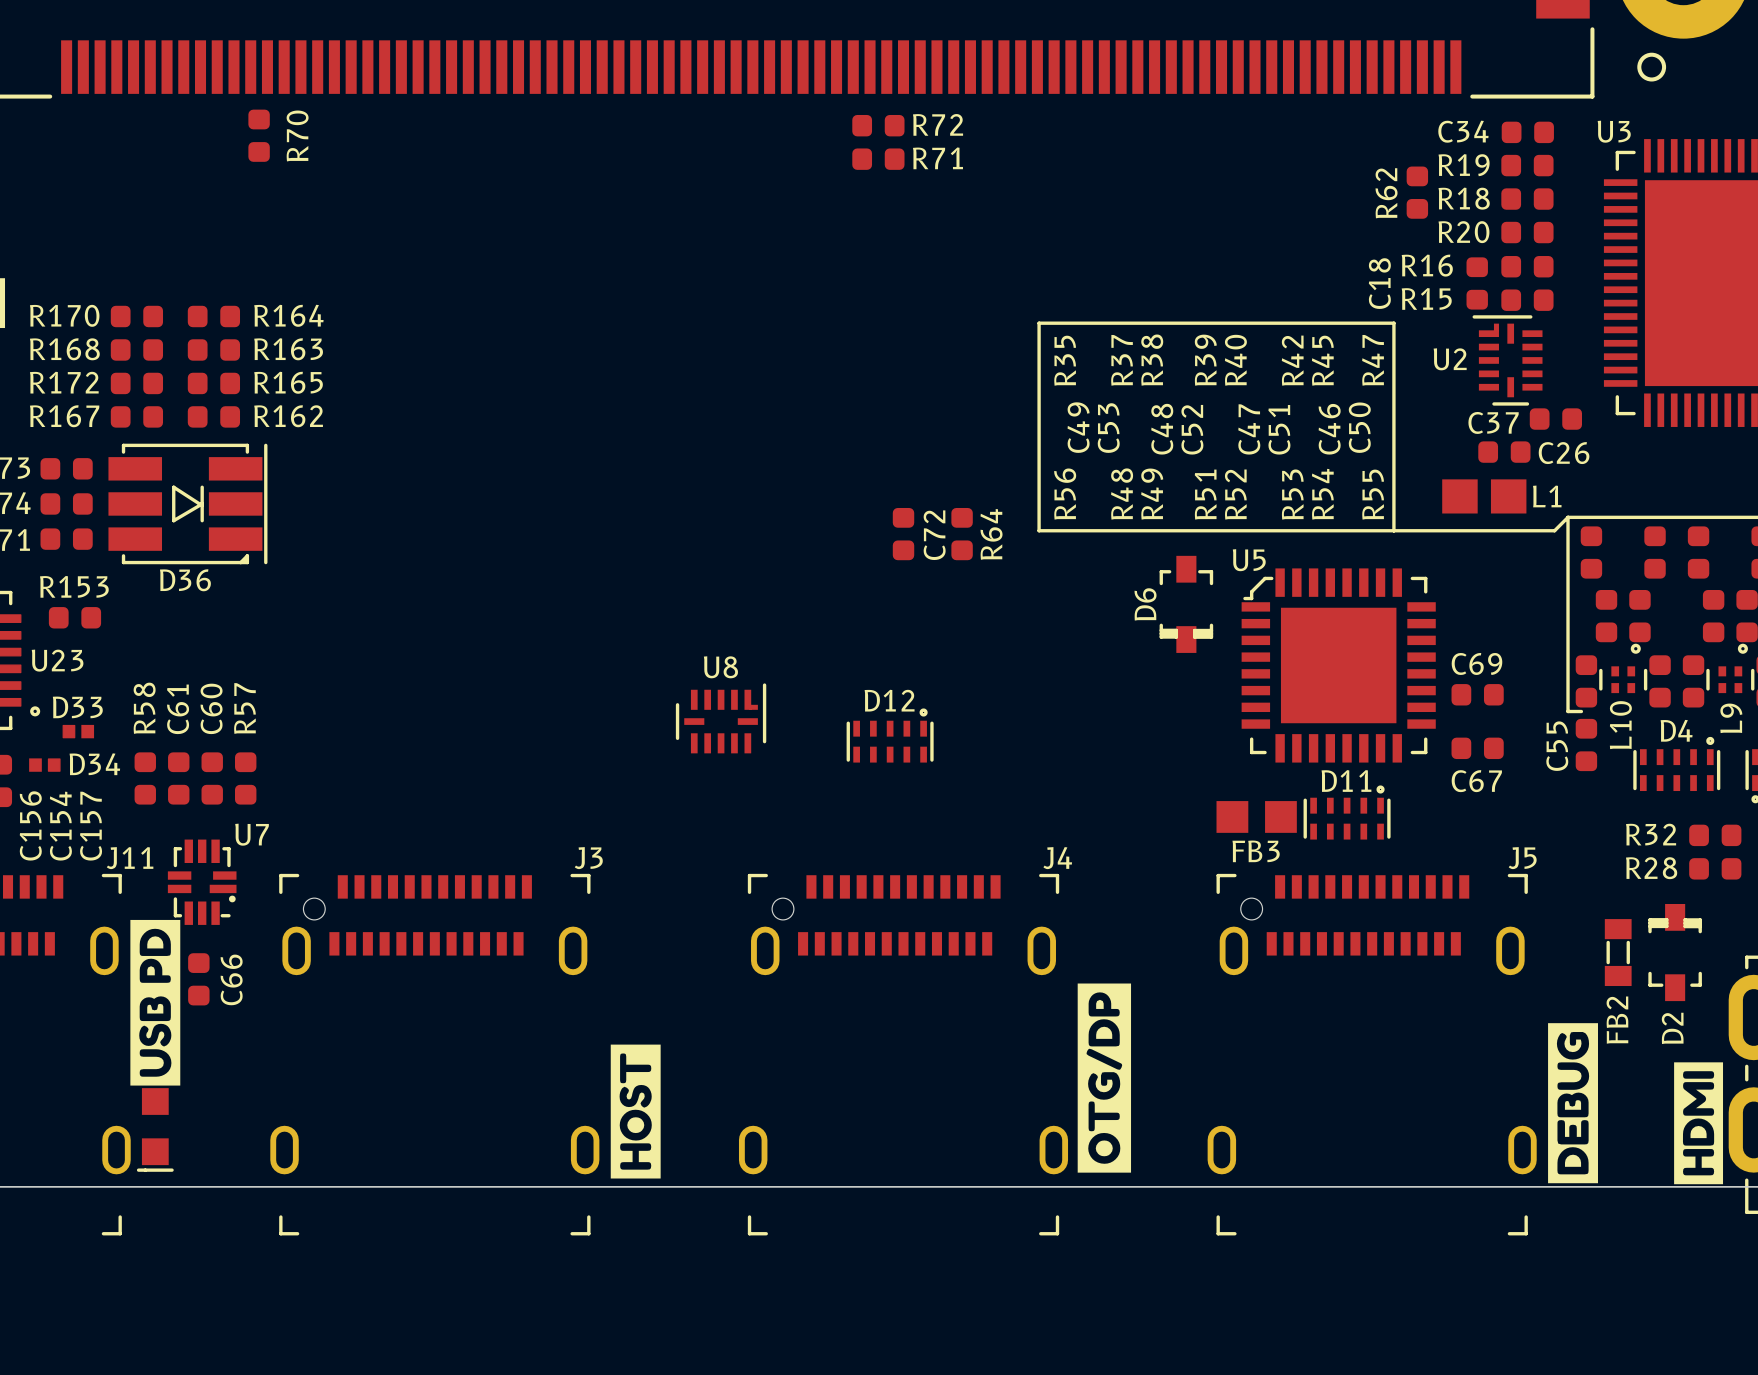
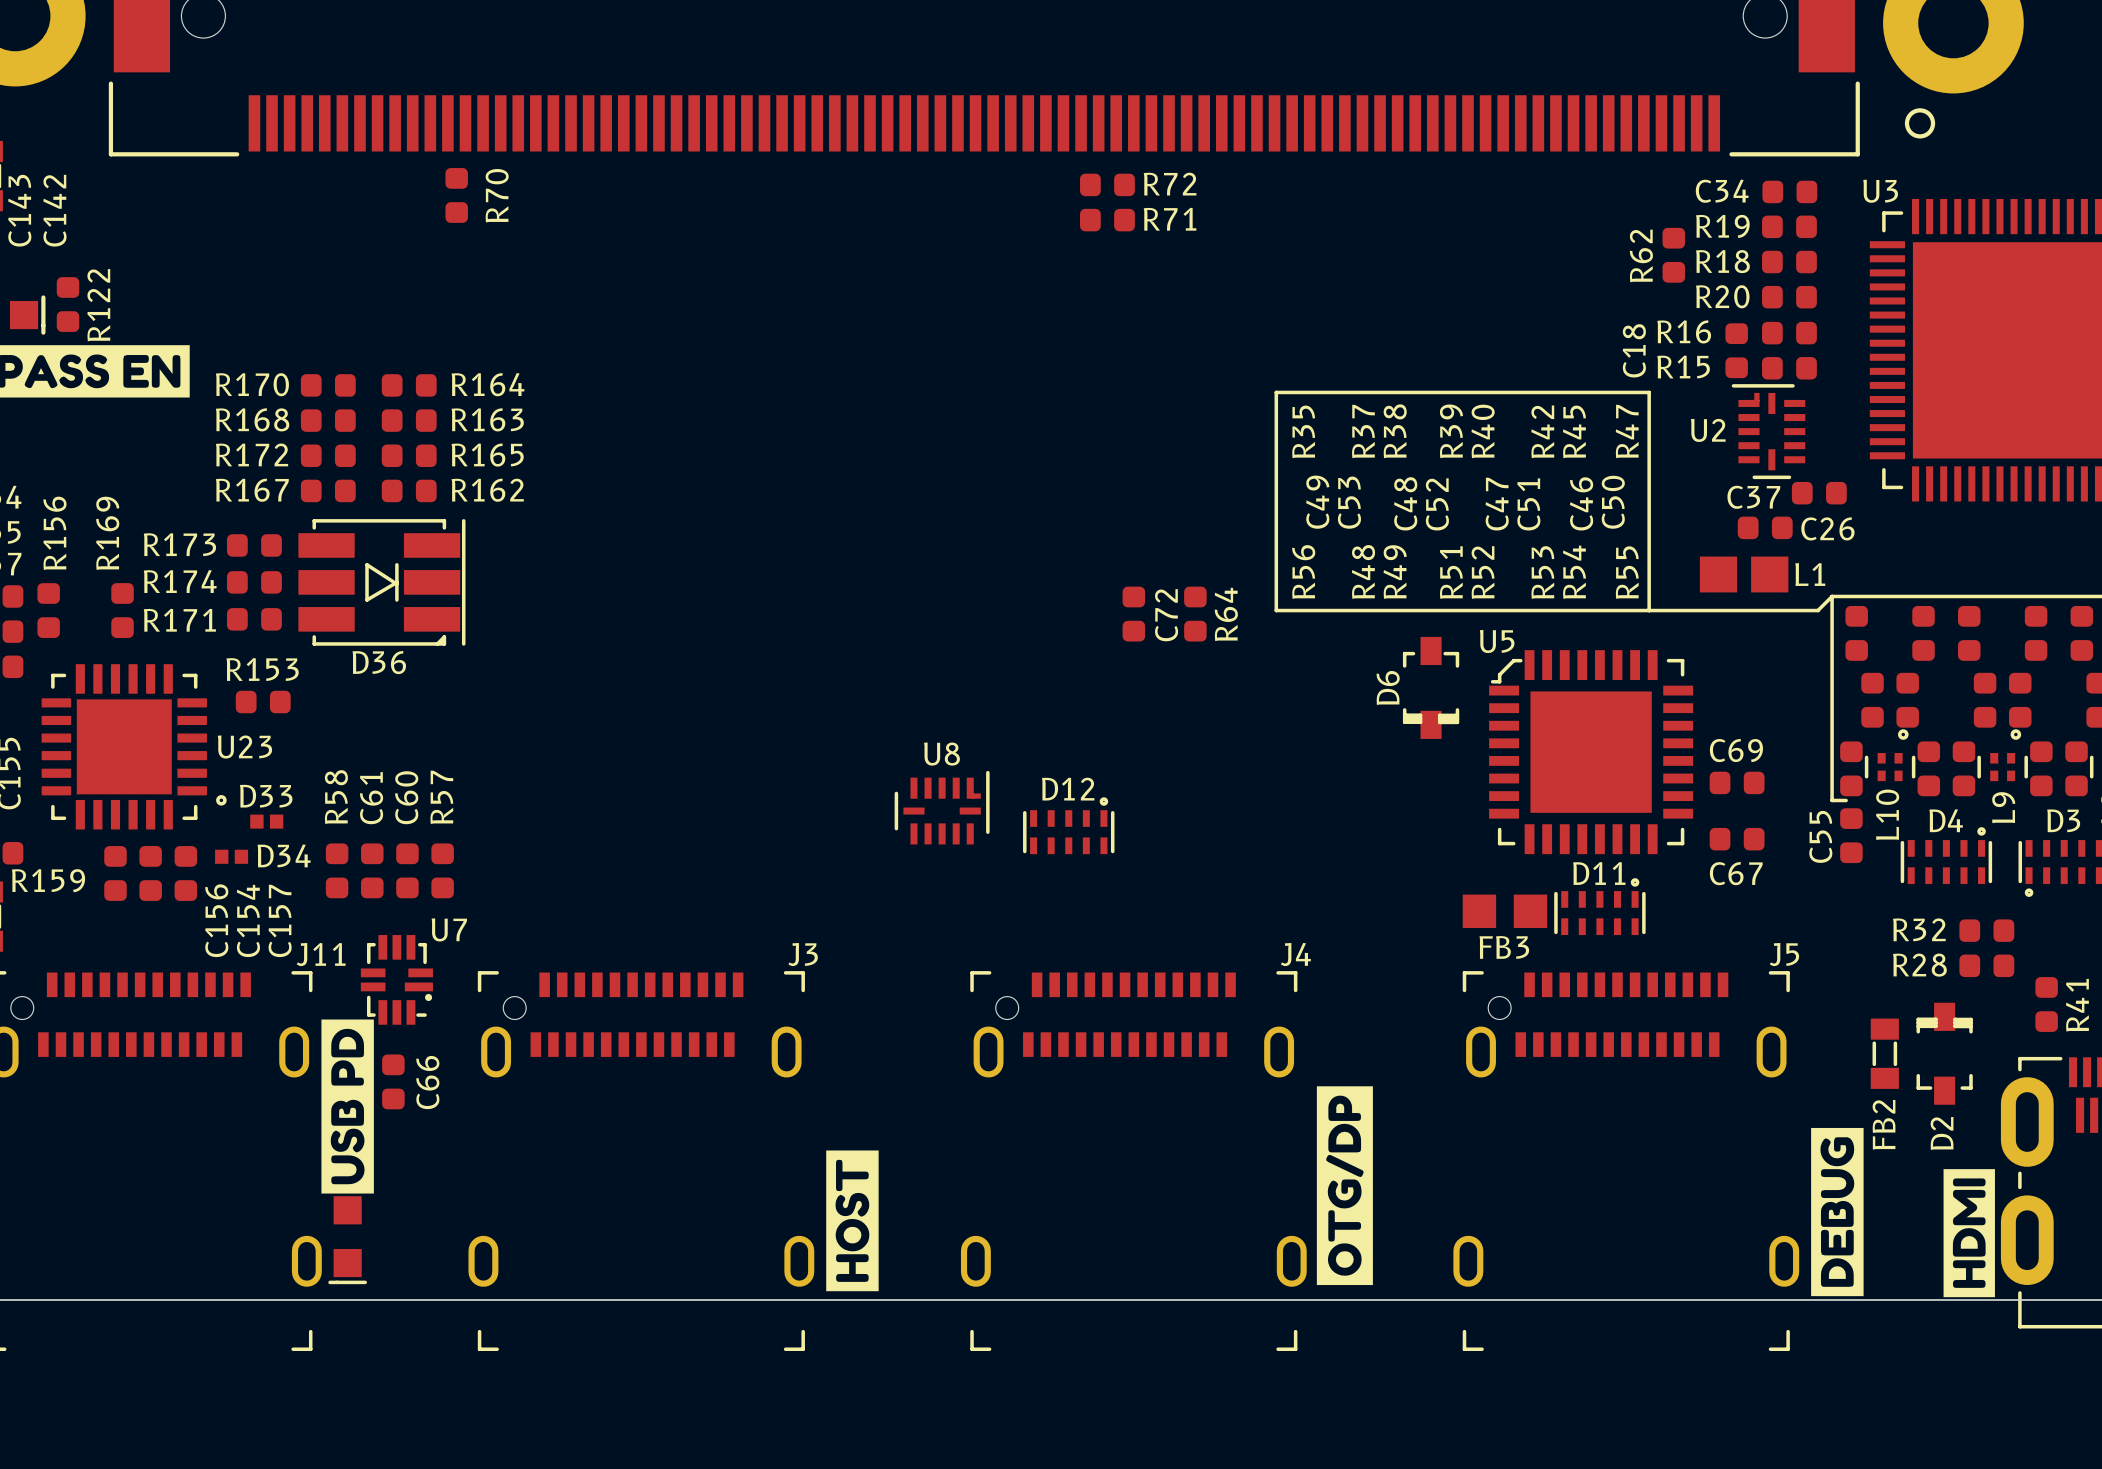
D12 position: (890, 735) -> (1068, 825)

